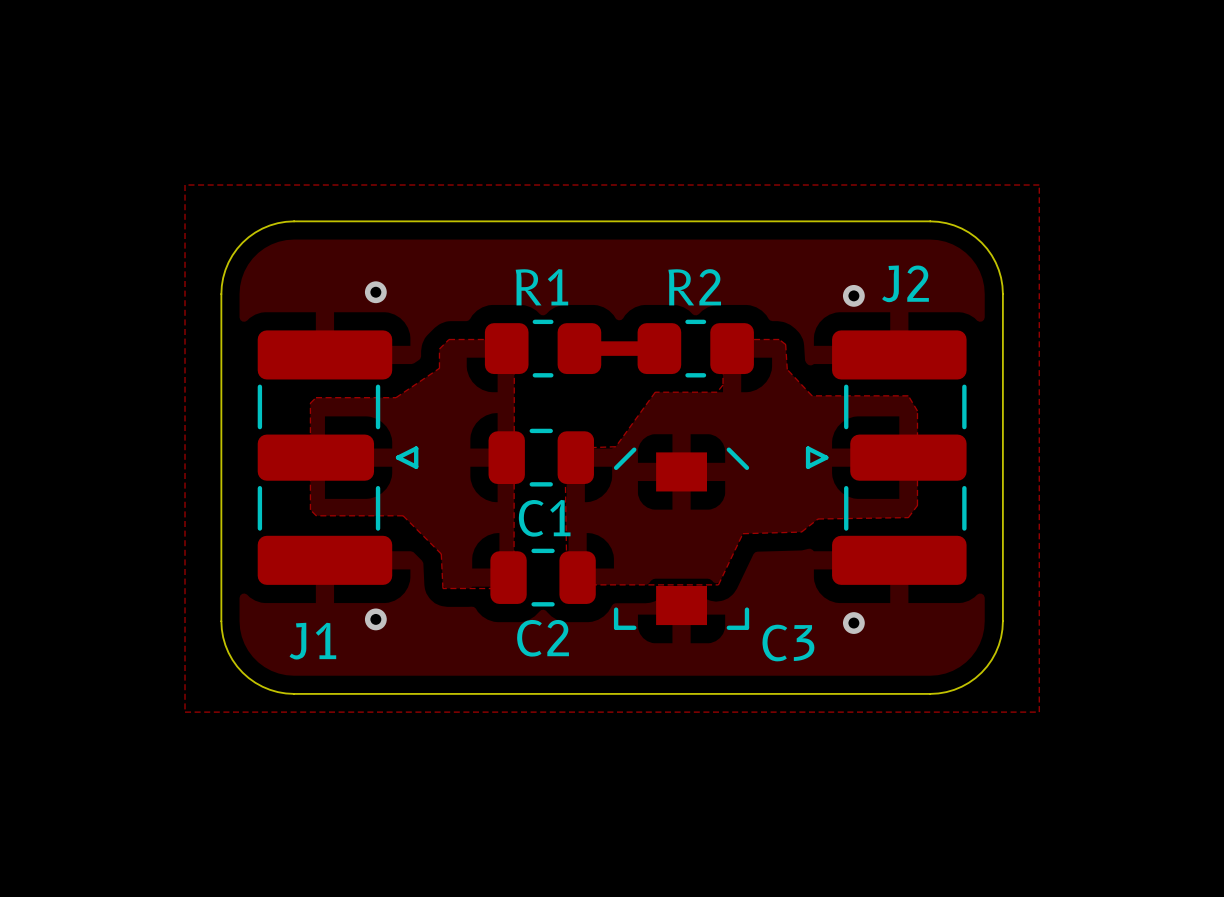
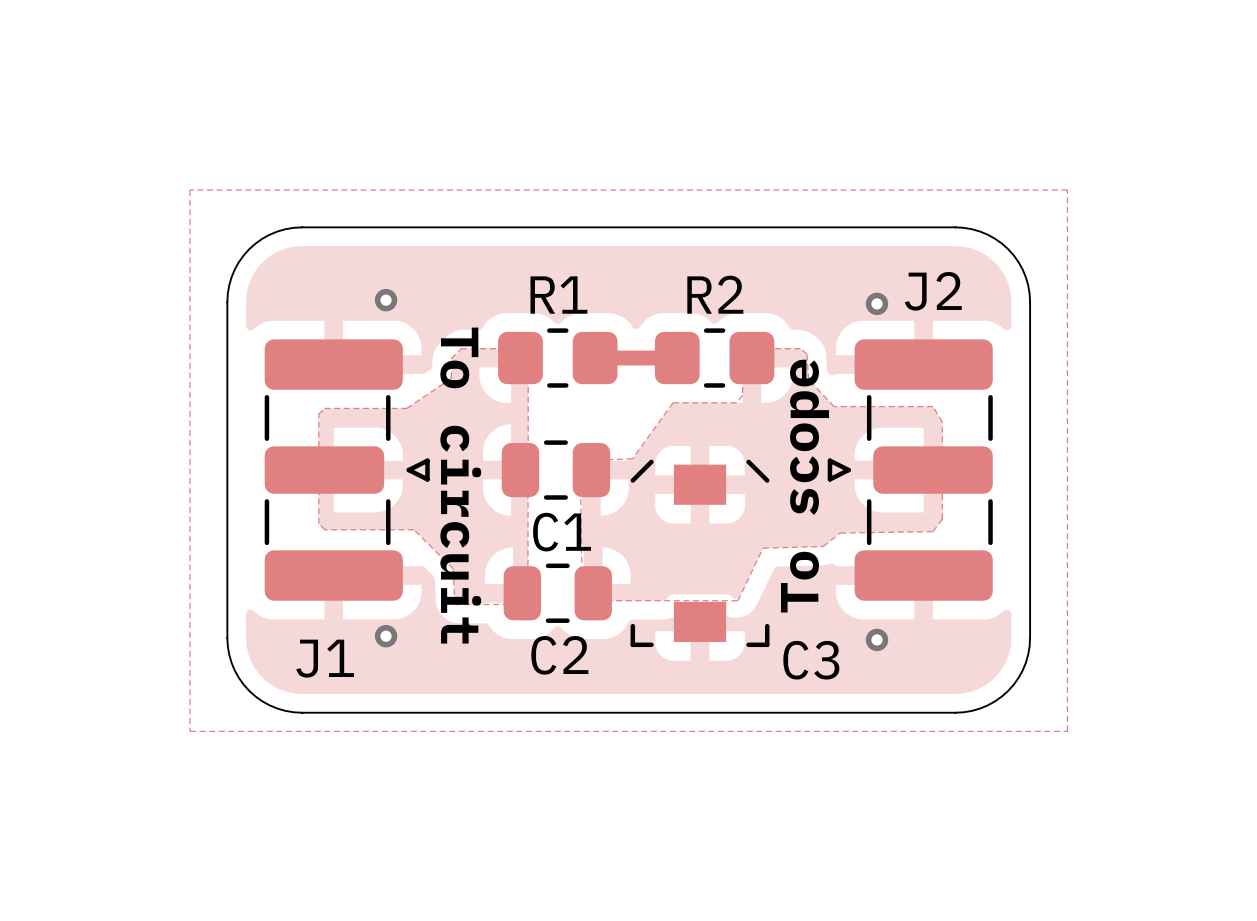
text: none -> To circuit (460, 485)
text: none -> To scope (804, 486)

